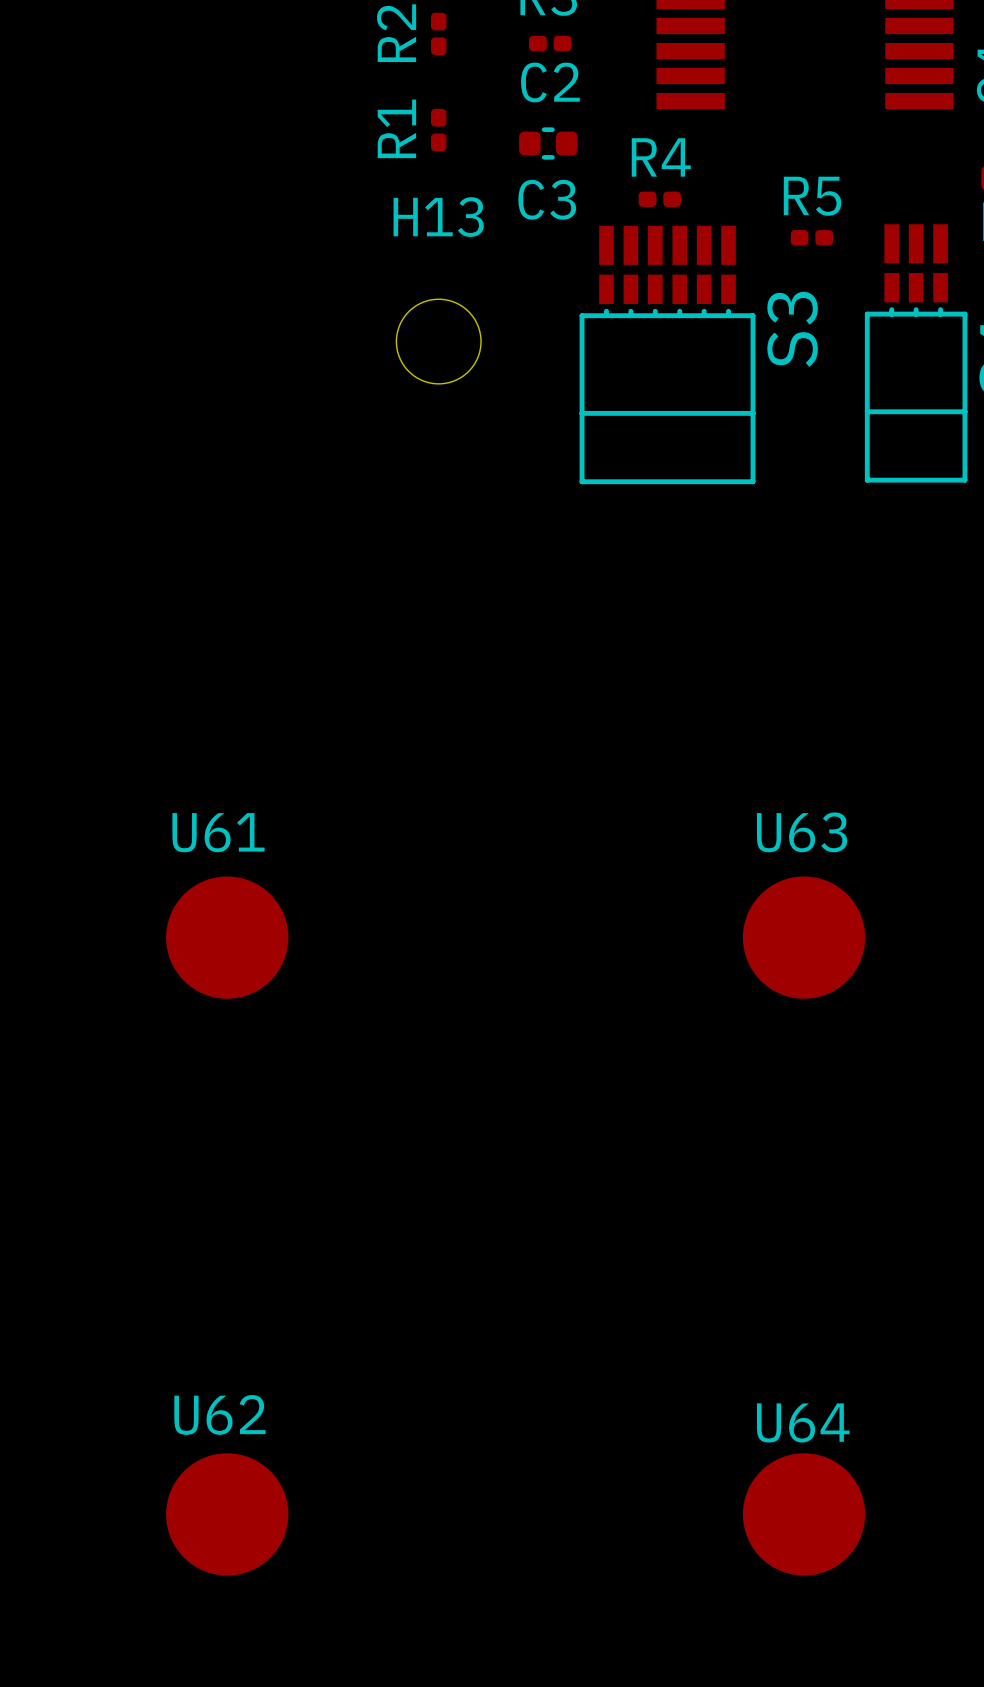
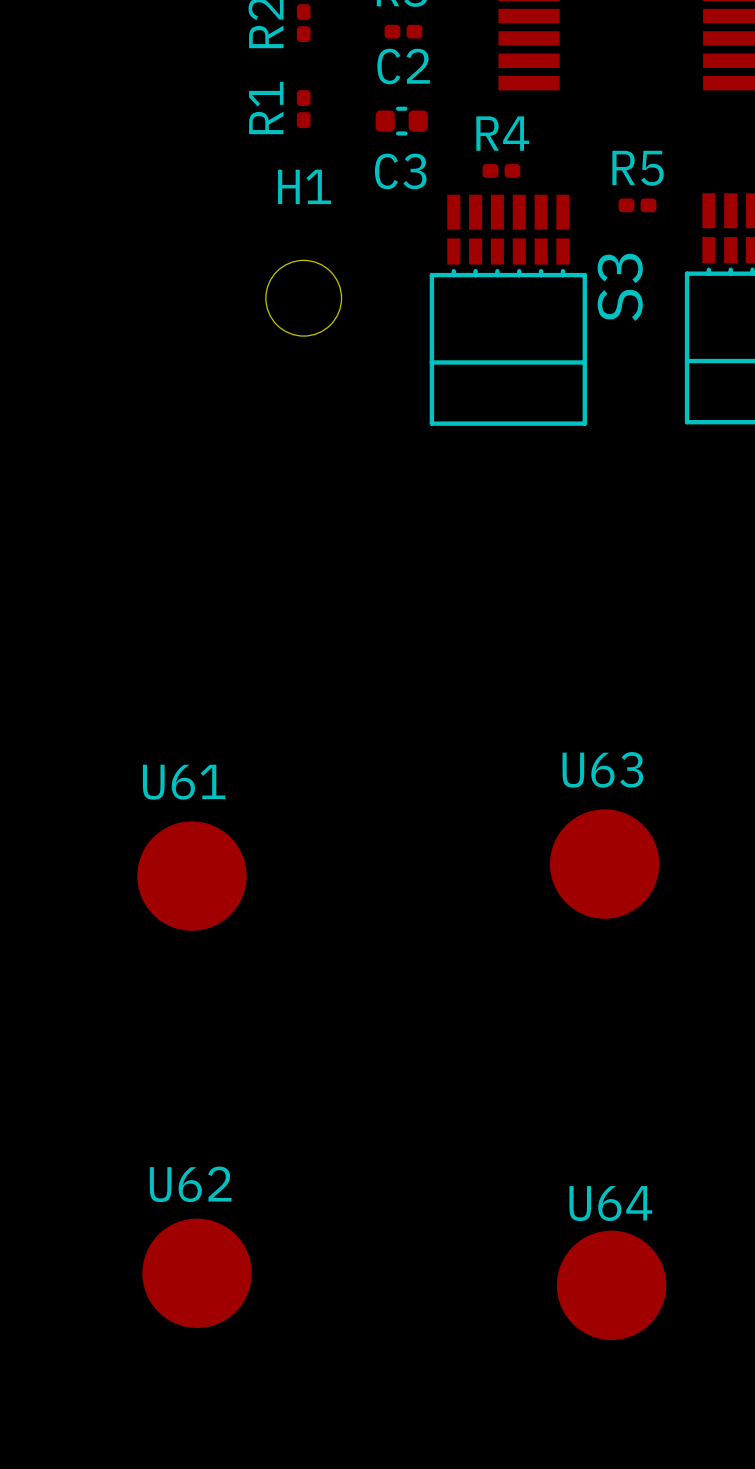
H13 name: H13 (438, 217) -> H1 (304, 186)
U61 position: (227, 937) -> (191, 876)
U63 position: (804, 937) -> (604, 864)
U62 position: (227, 1514) -> (197, 1273)
U64 position: (804, 1514) -> (611, 1285)

